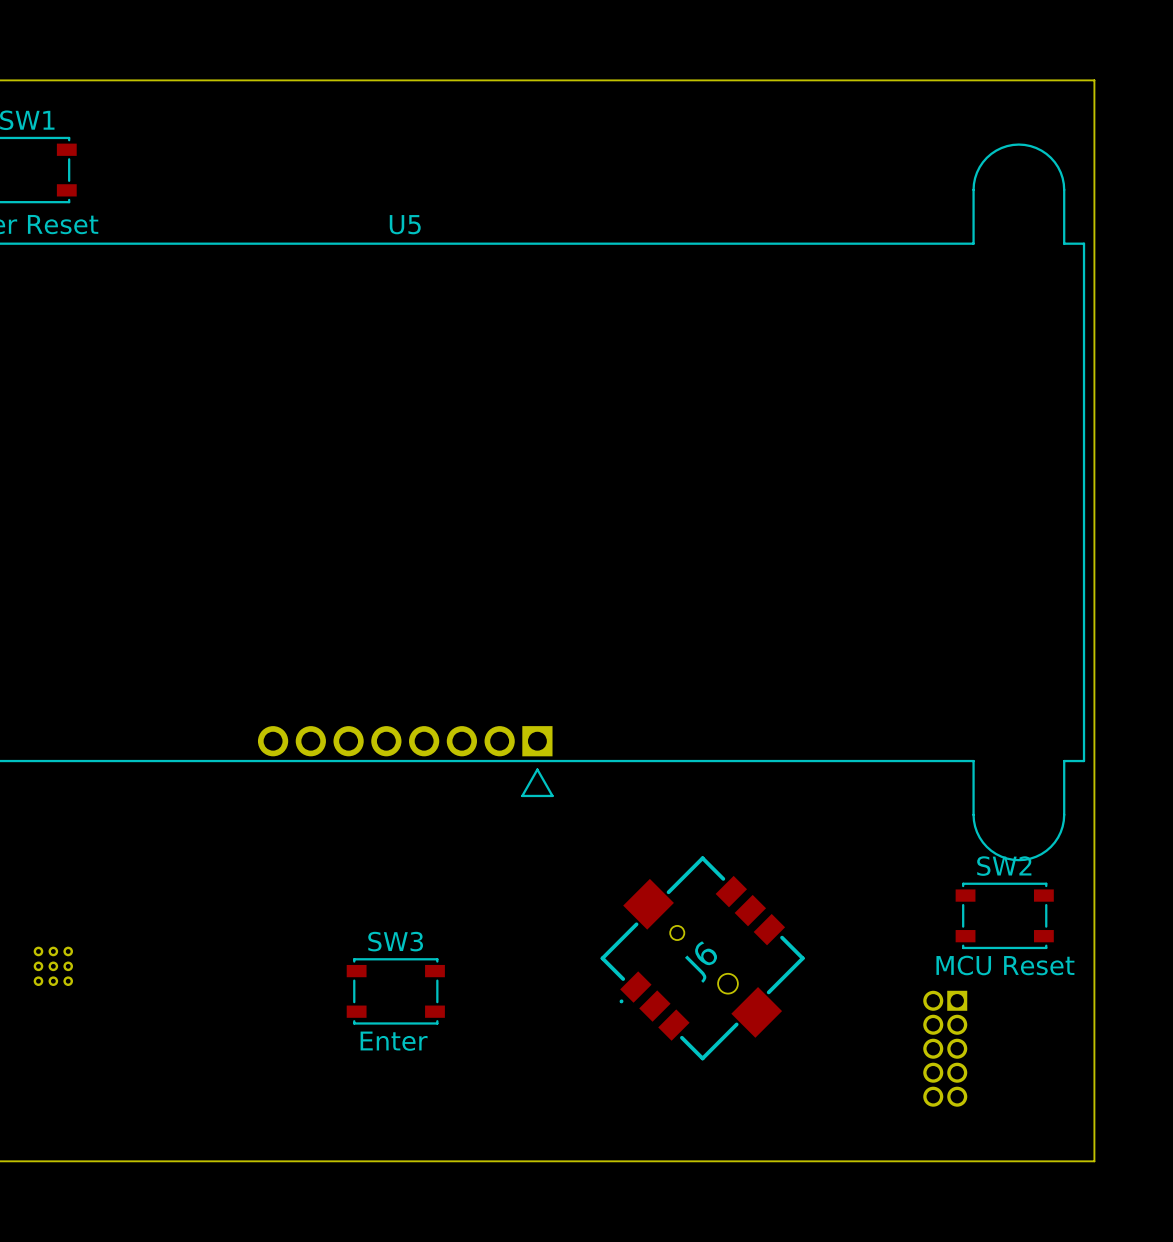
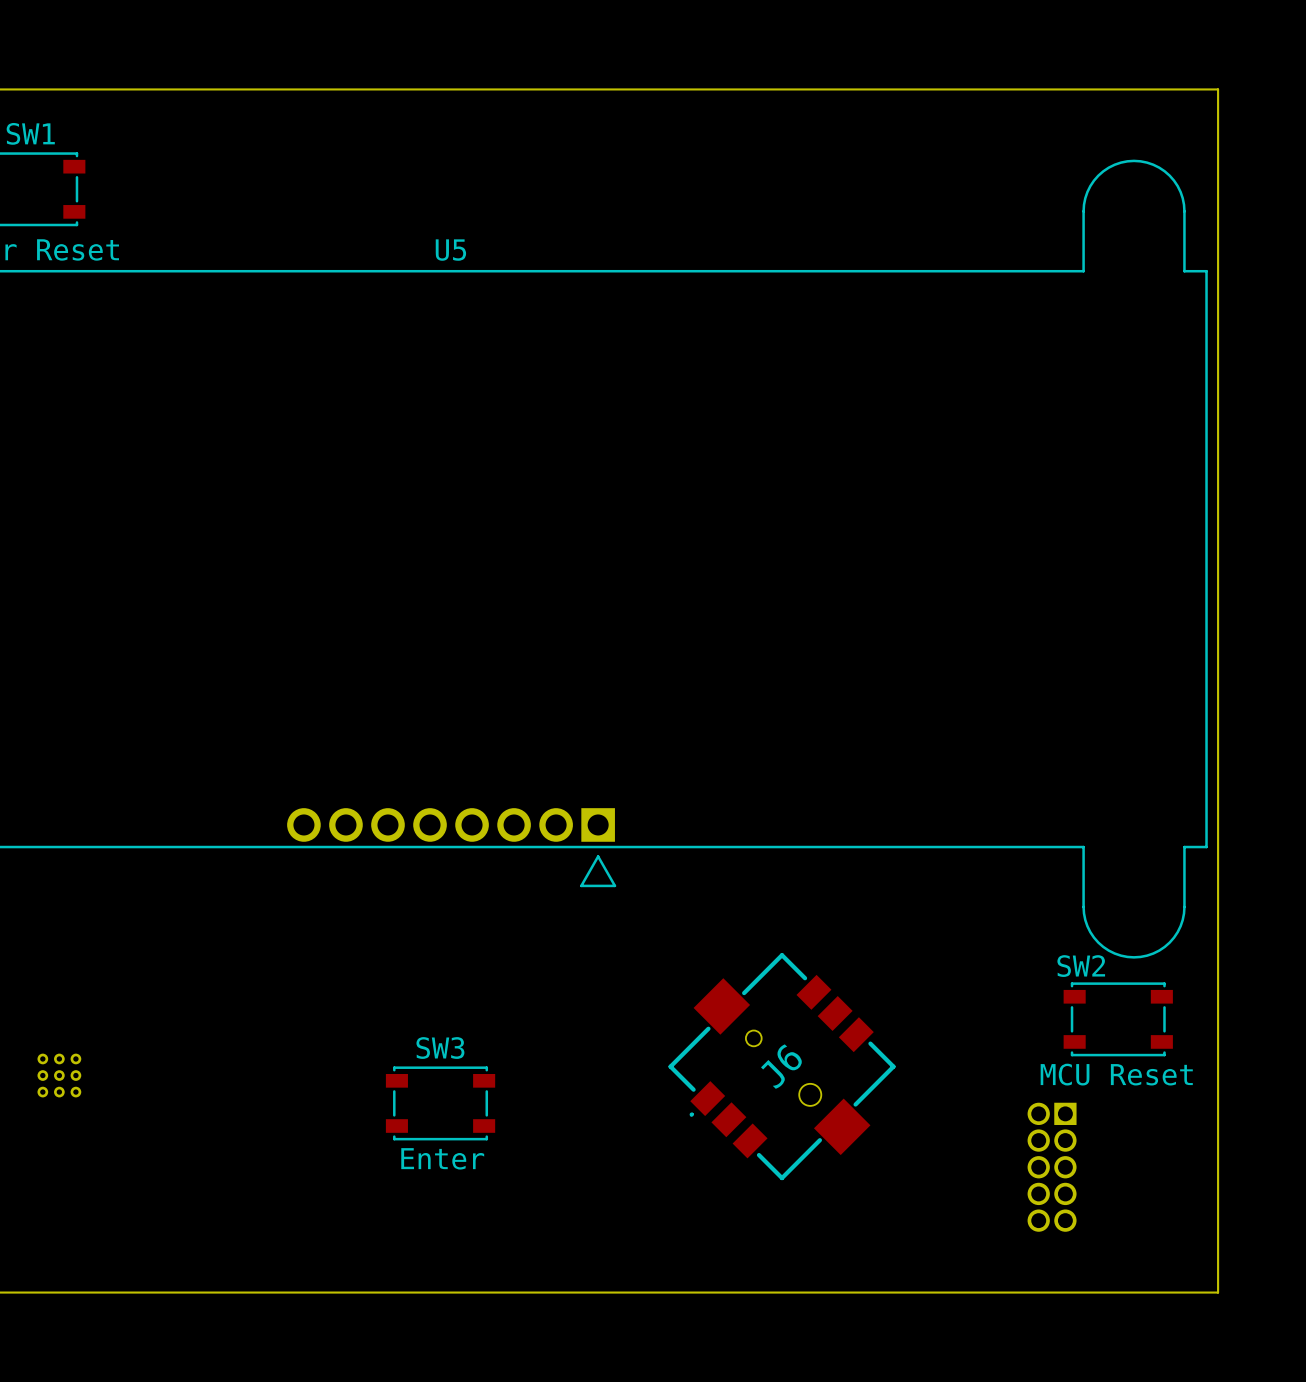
SW2 name position: SW2 (1004, 866) -> SW2 (1081, 966)

